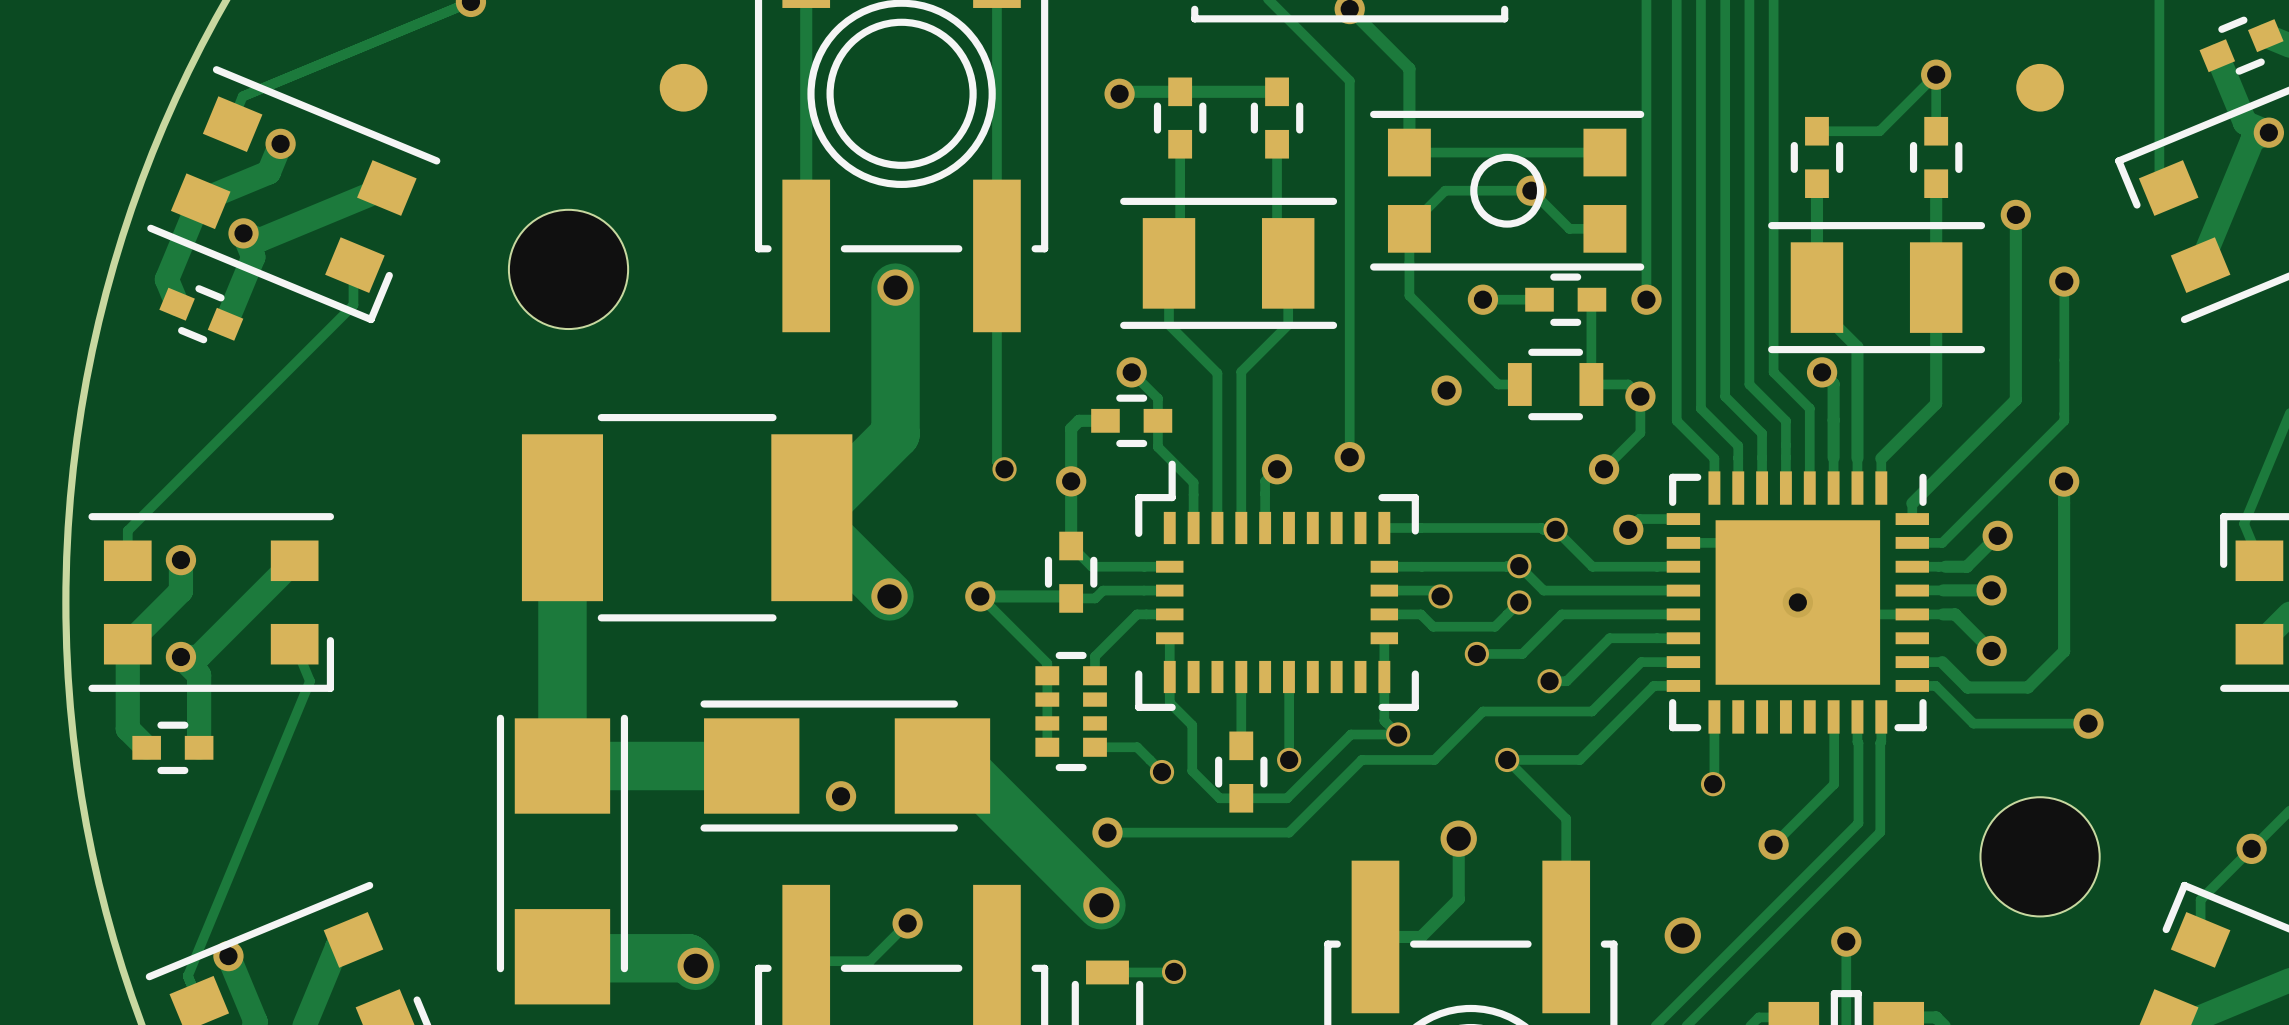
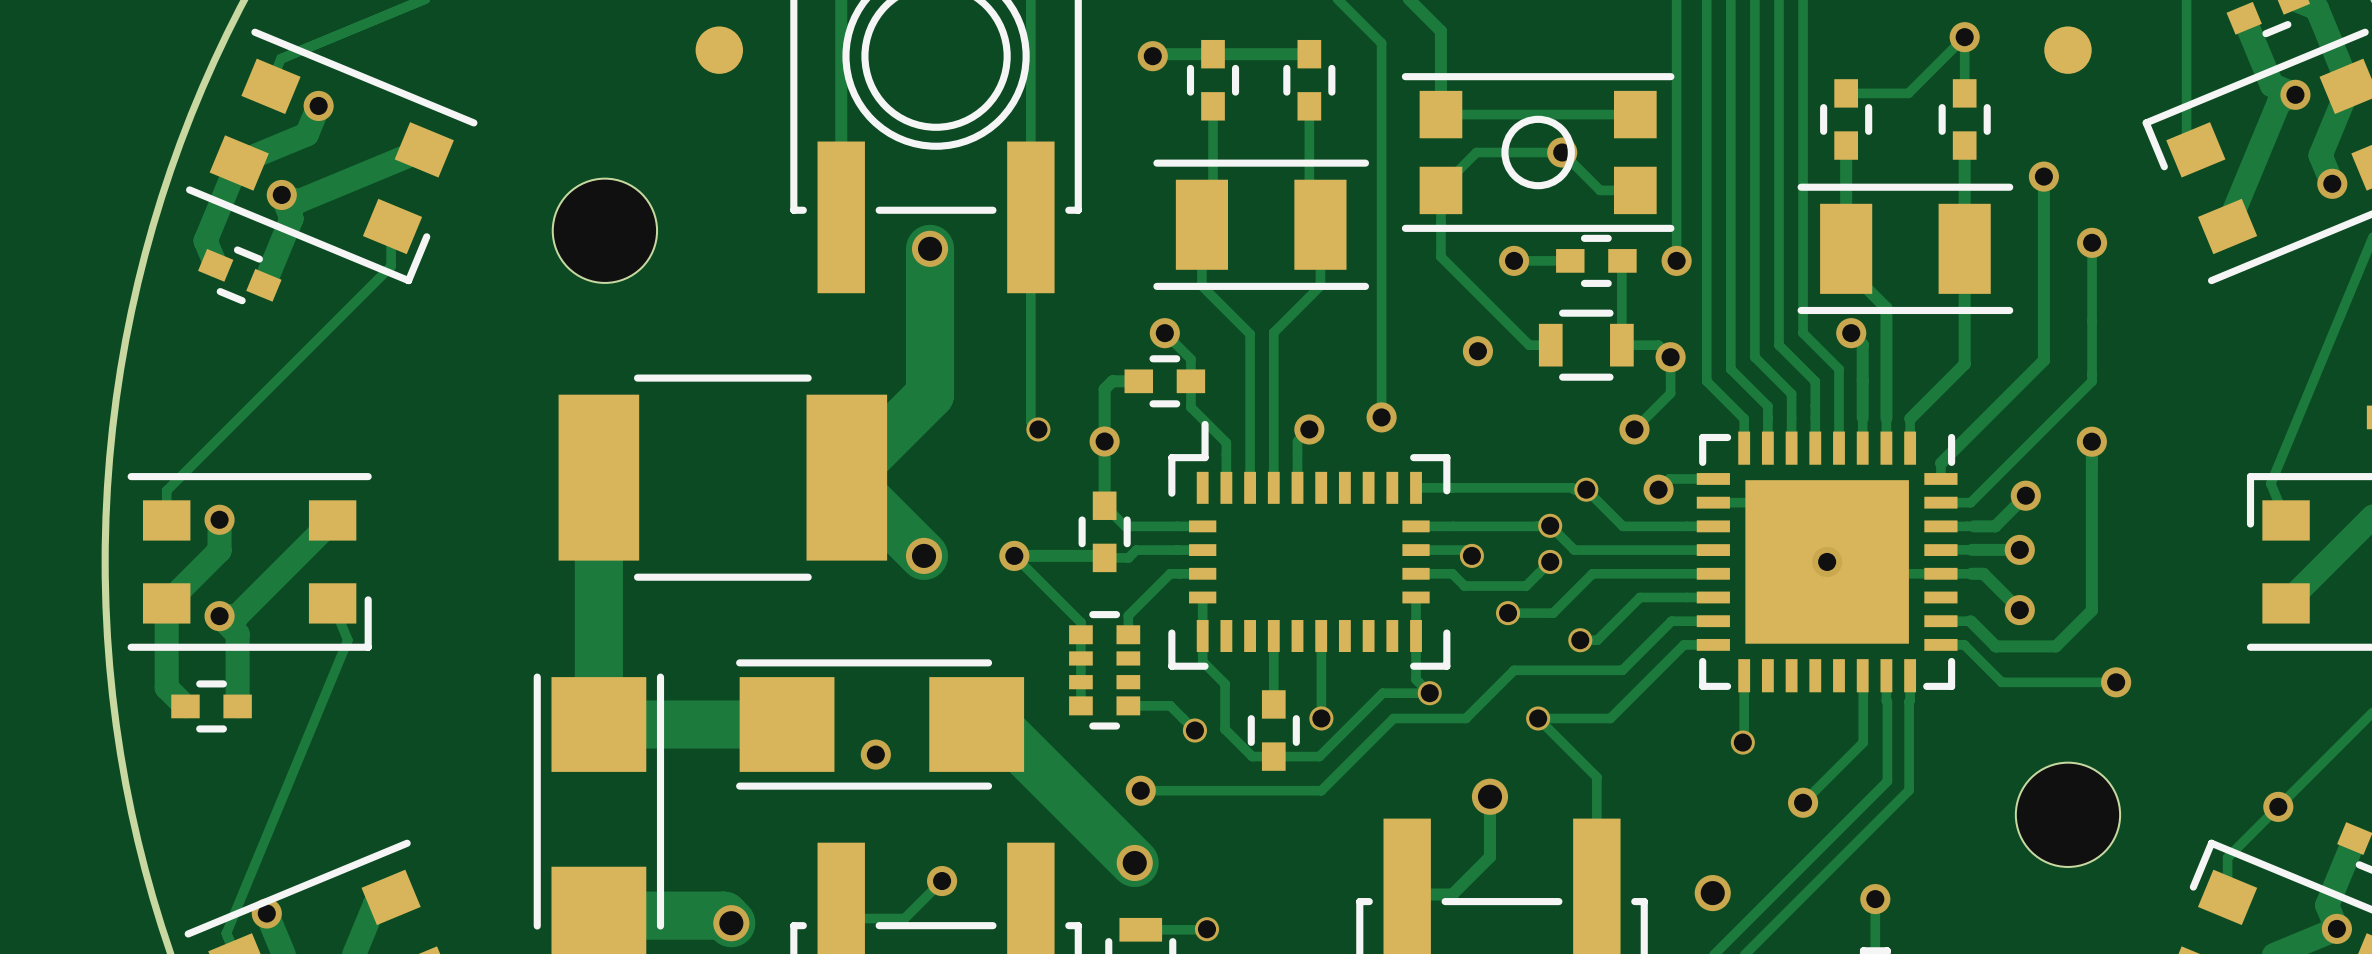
part footprint: [508, 209, 629, 330] -> [552, 178, 658, 283]
part footprint: [1980, 797, 2100, 917] -> [2015, 762, 2121, 867]

